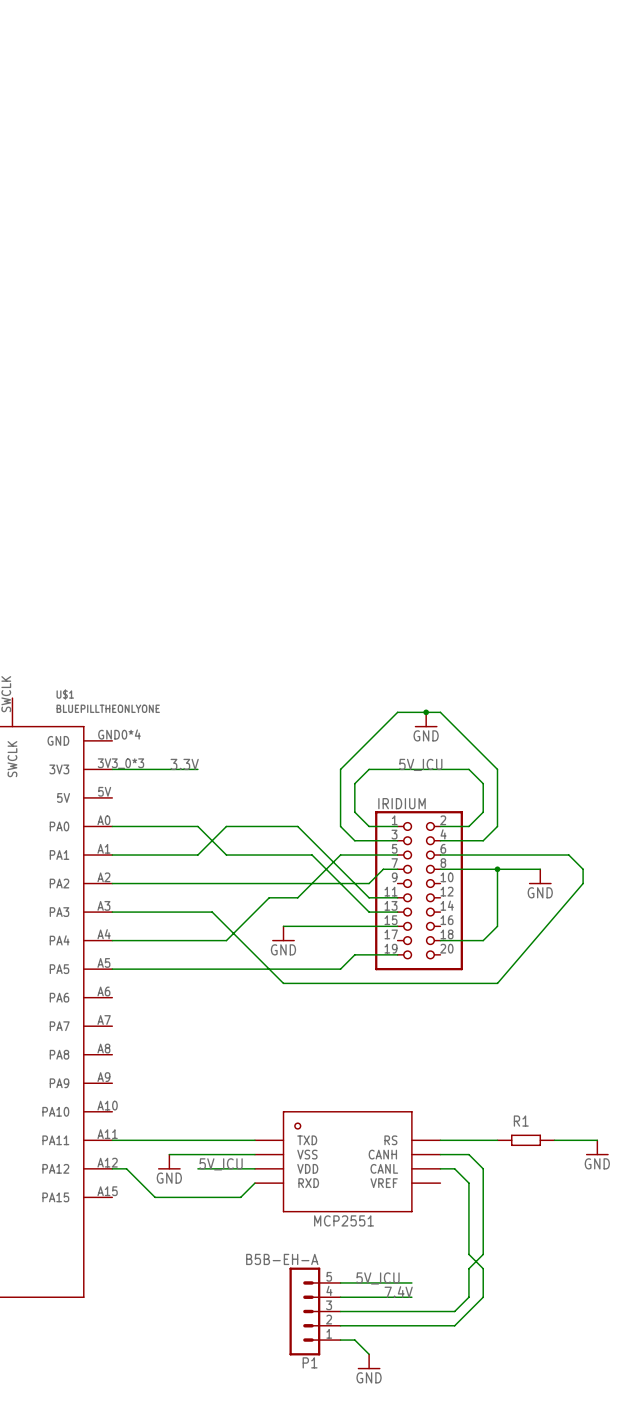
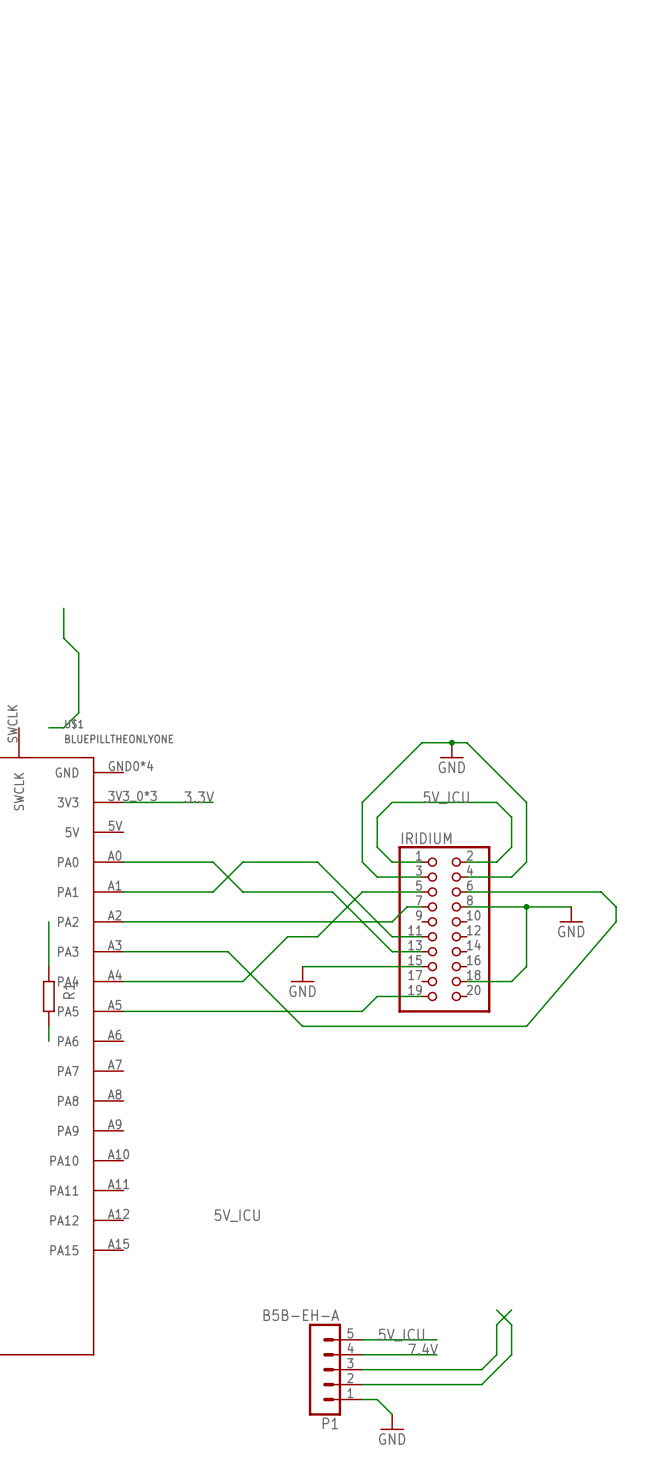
wire: none -> (63, 608) (63, 638) (78, 653) (78, 712) (63, 727) (48, 727)
wire: none -> (48, 921) (48, 966)
wire: none -> (48, 1026) (48, 1041)
wire: (112, 1140) (254, 1140) -> none
wire: (440, 1140) (497, 1140) -> none
R1 rotation: 0° (526, 1140) -> 90° clockwise (48, 996)
R1 position: (526, 1140) -> (48, 996)
wire: (554, 1140) (597, 1140) -> none
power symbol: GND (597, 1147) -> none
wire: (169, 1154) (254, 1154) -> none
wire: (440, 1154) (468, 1154) (483, 1168) (483, 1254) -> none
part: (347, 1161) -> none
power symbol: GND (169, 1162) -> none
wire: (112, 1168) (126, 1168) (155, 1197) (240, 1197) (254, 1183) -> none
wire: (197, 1168) (254, 1168) -> none
wire: (440, 1168) (454, 1168) (468, 1183) (468, 1254) -> none

